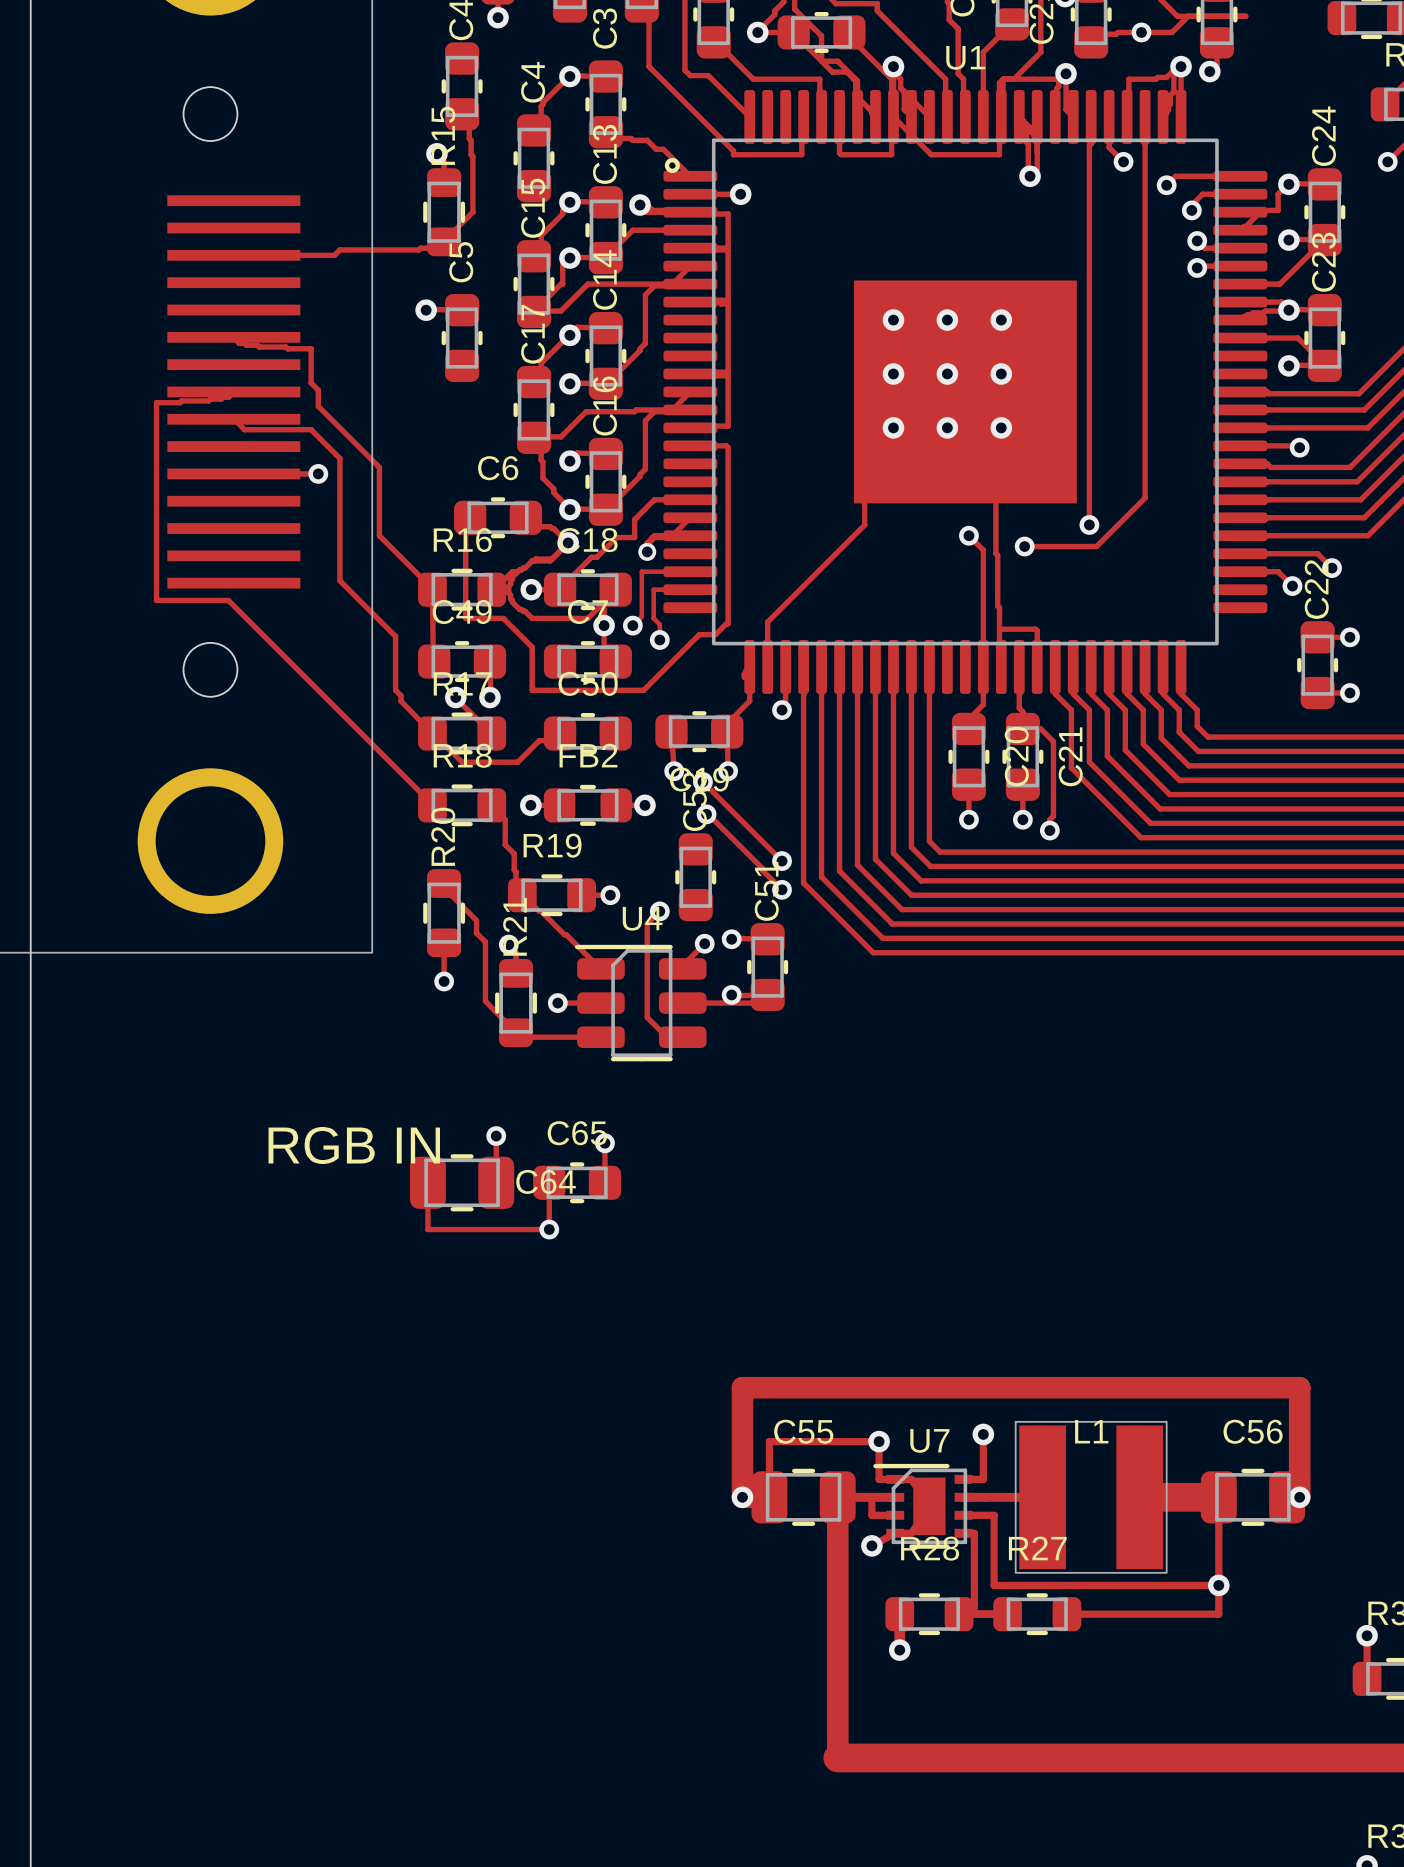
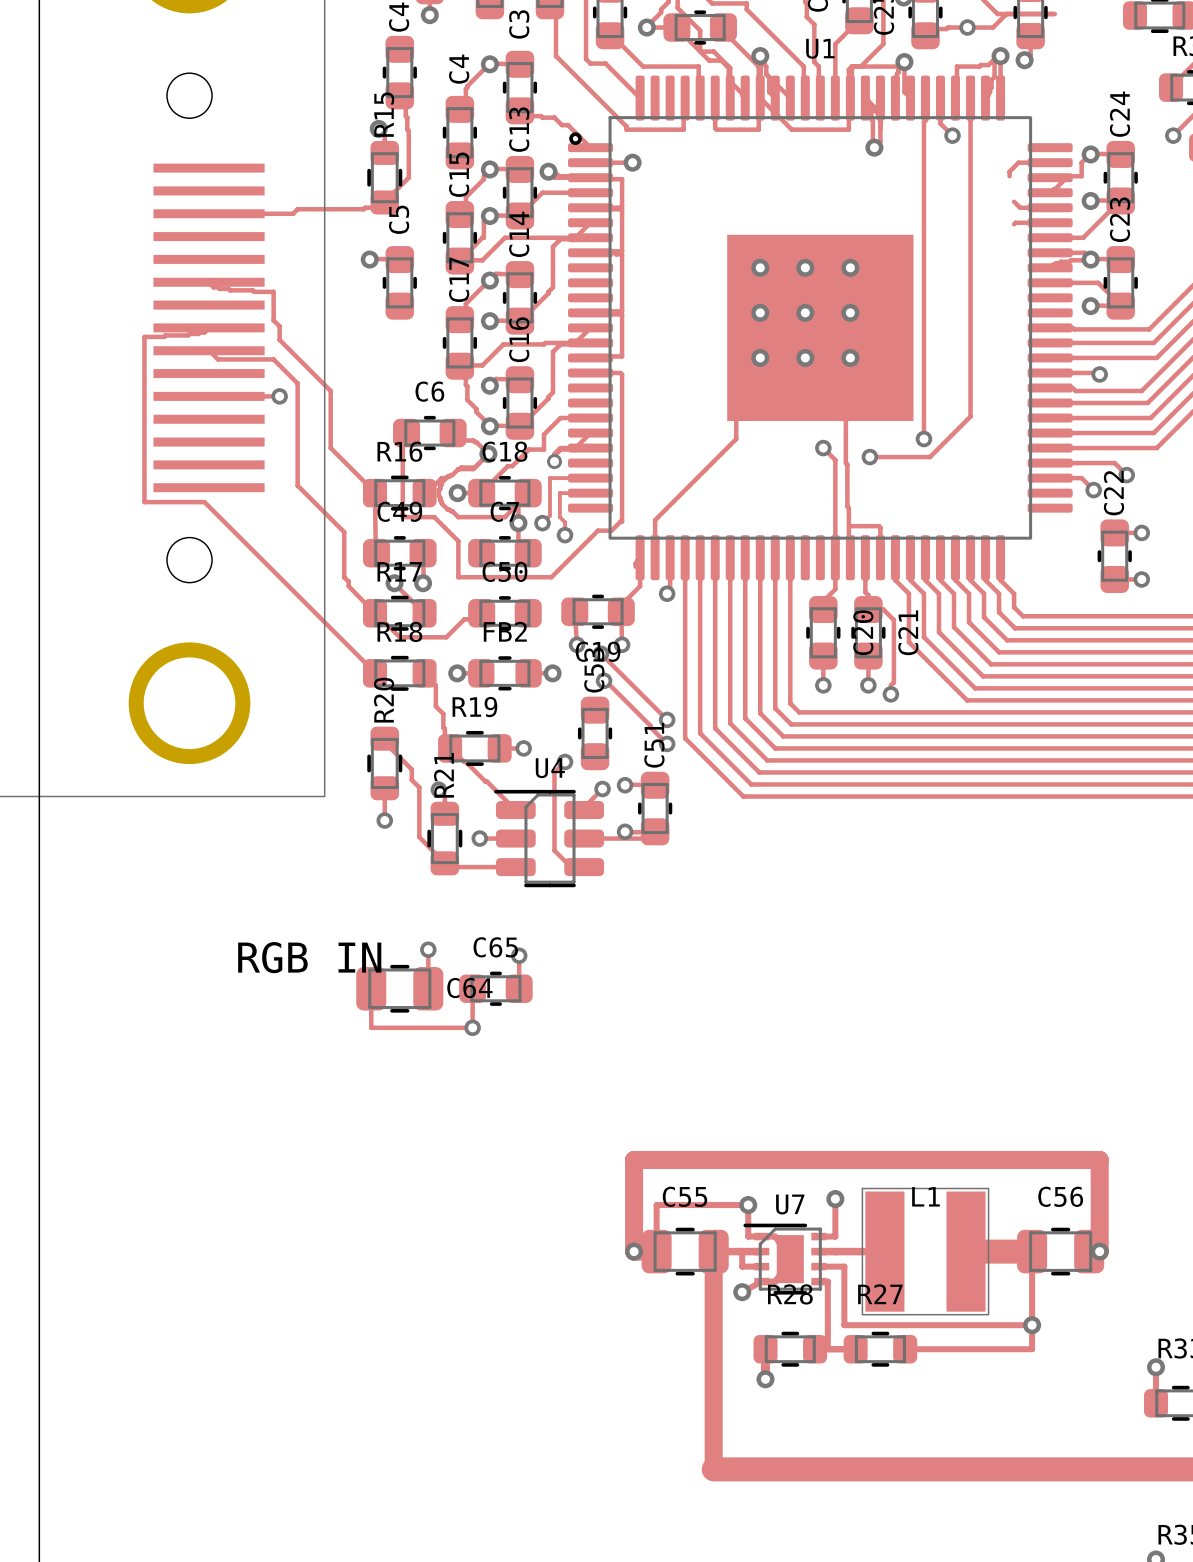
track: (1240, 176) (1175, 176) (1166, 185) -> none
via: (1166, 185) -> none
via: (1191, 210) -> none
via: (1197, 240) -> none
via: (1197, 267) -> none

